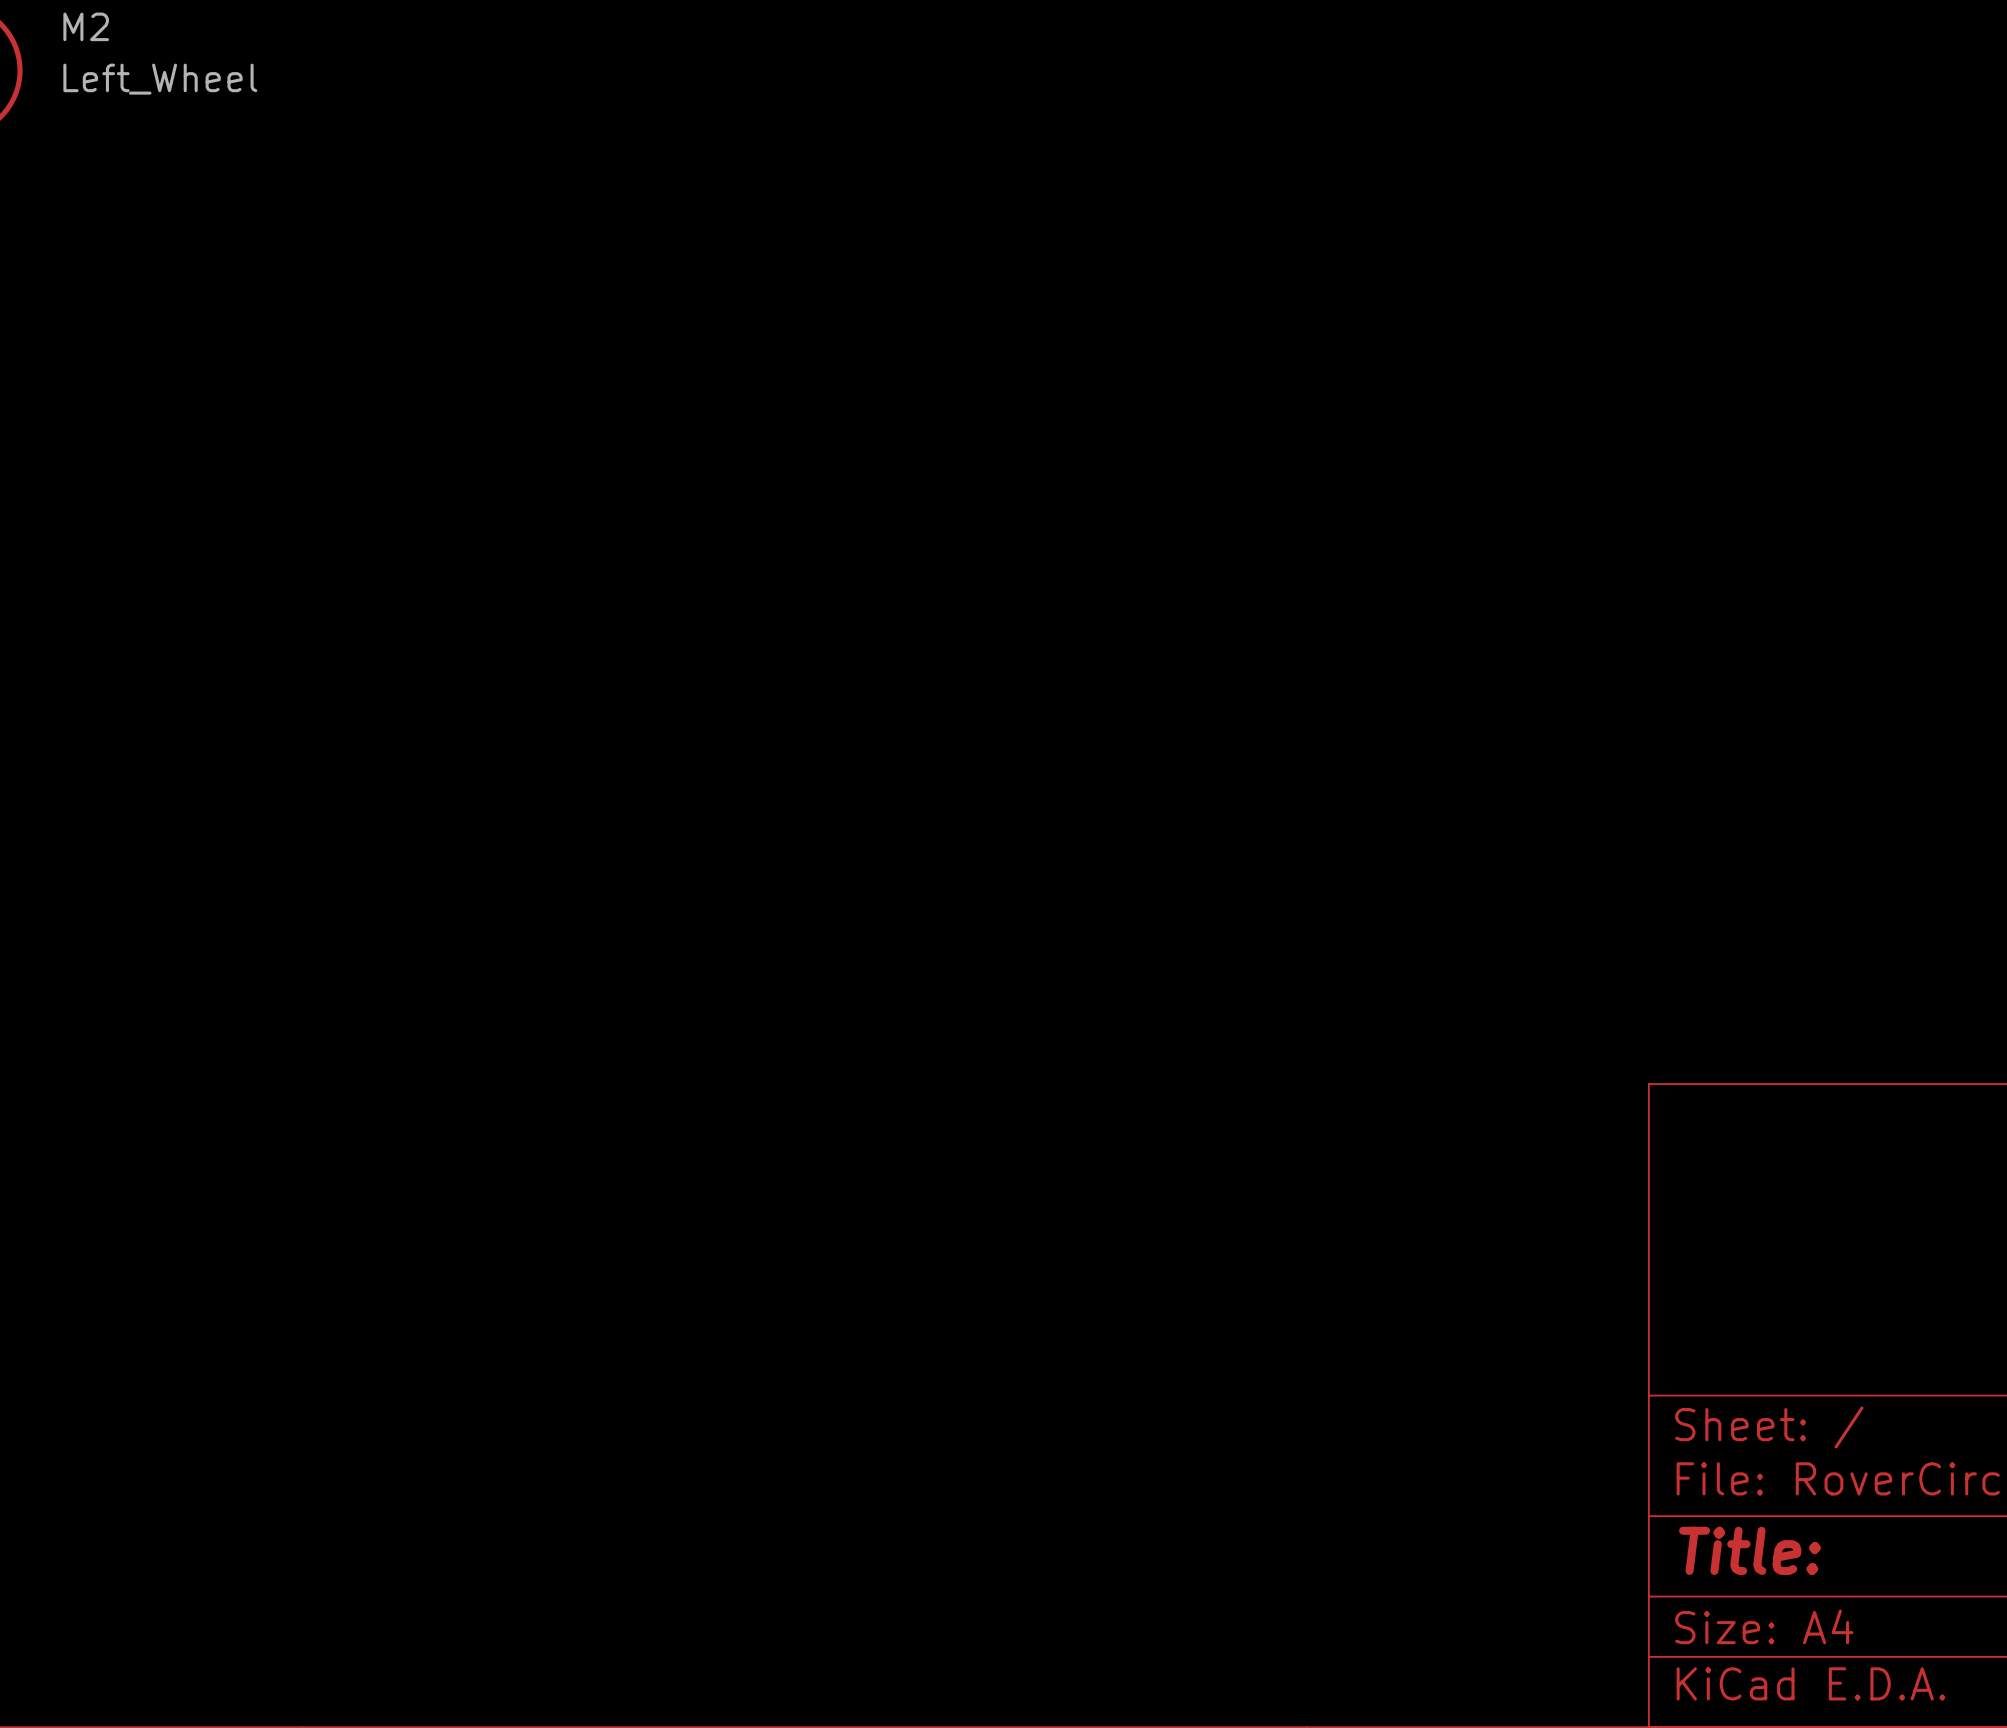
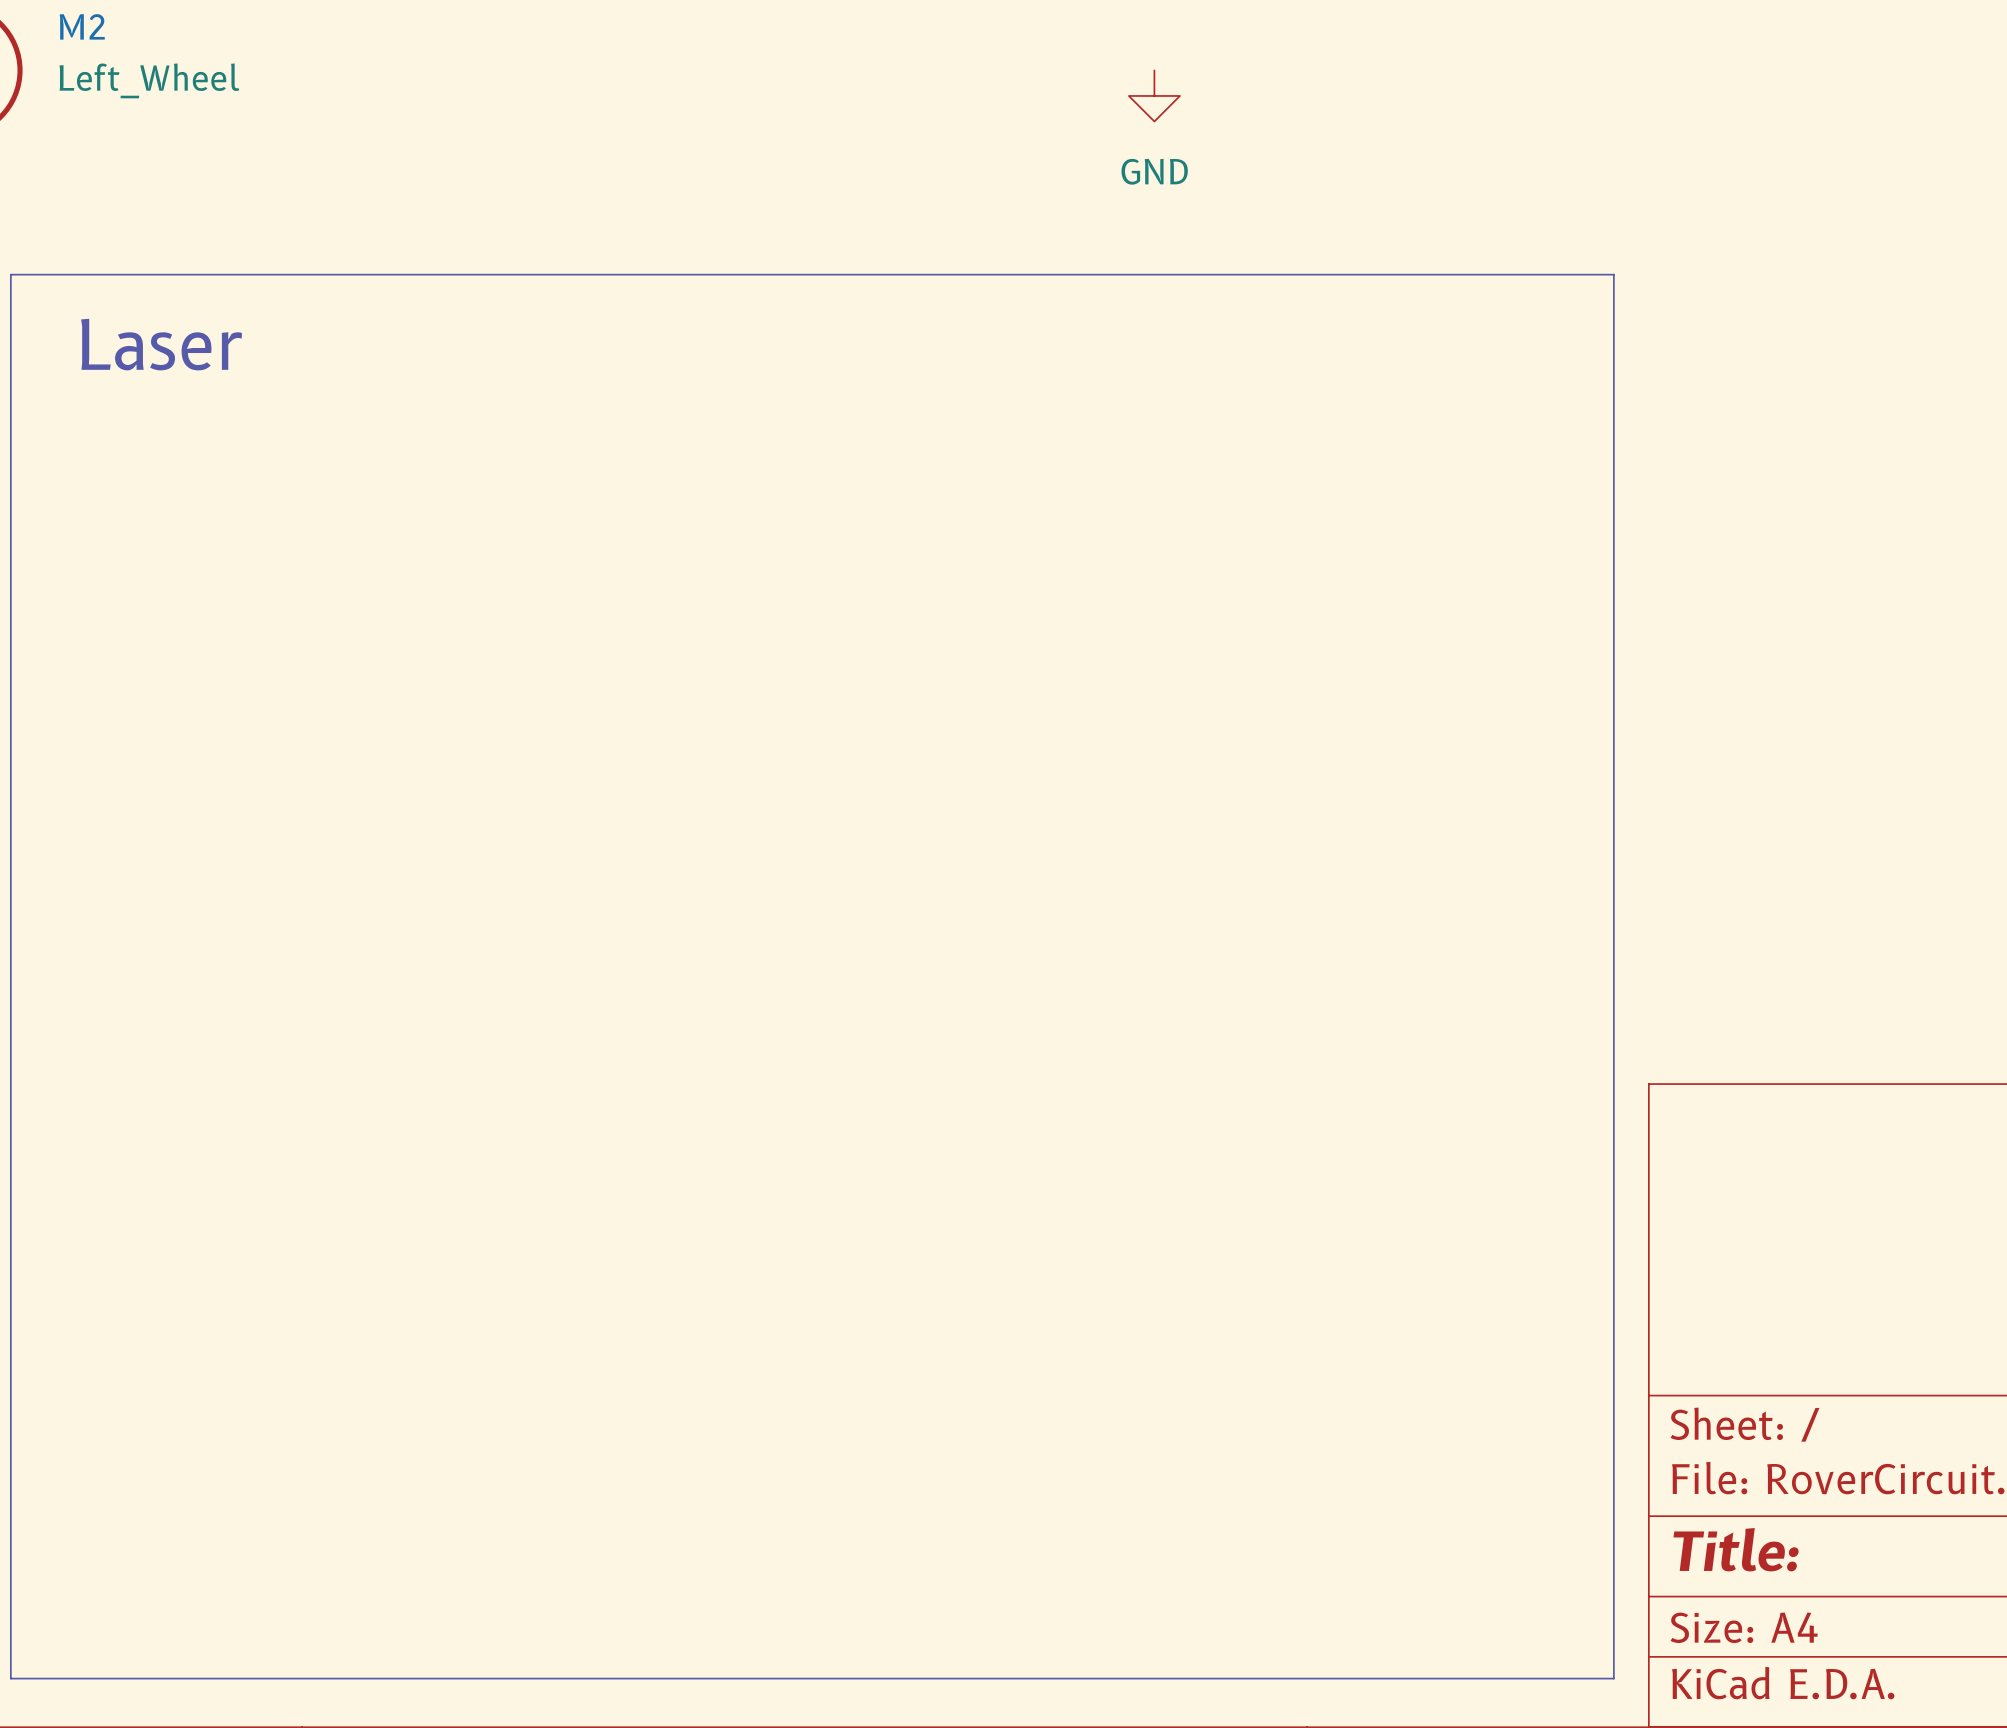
power symbol: none -> GND (1154, 95)
line: none -> (10, 274) (1613, 274) (1613, 1678) (10, 1678) (10, 274)
text: none -> Laser (161, 344)

